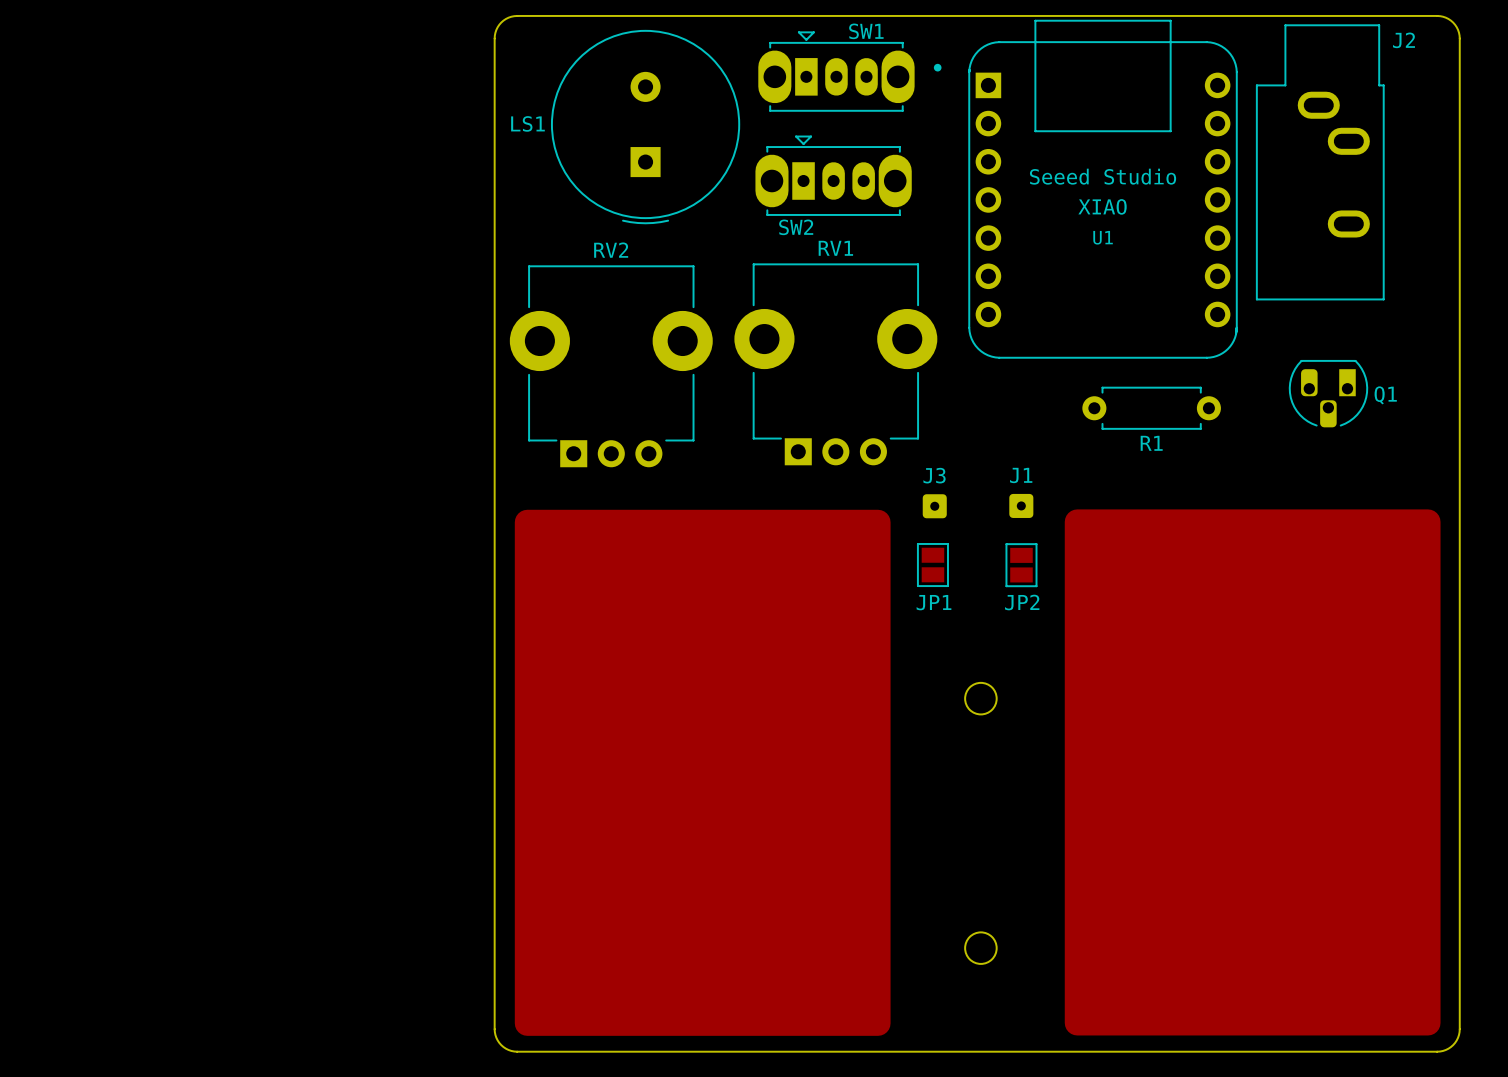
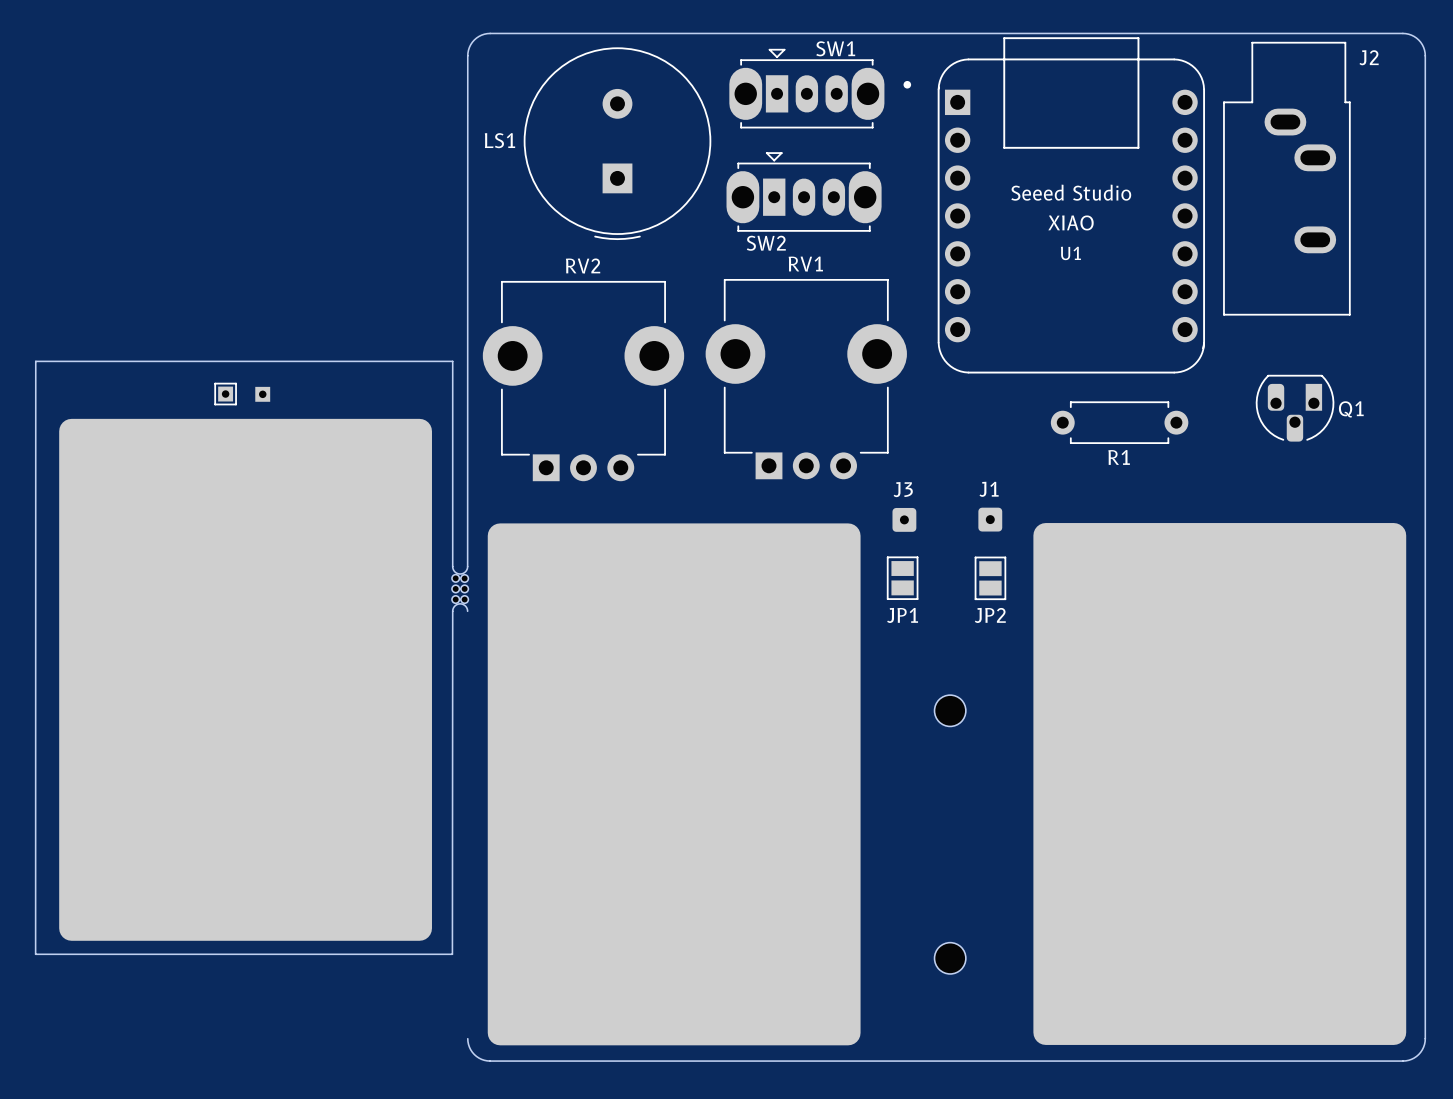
board edge: (494, 38) (494, 1029) -> (467, 55) (467, 566)
part: none -> (225, 394)
part: none -> (262, 394)
board edge: none -> (452, 566) (452, 361) (35, 361) (35, 954) (452, 954) (452, 611)
part: none -> (460, 588)
part: none -> (245, 679)

